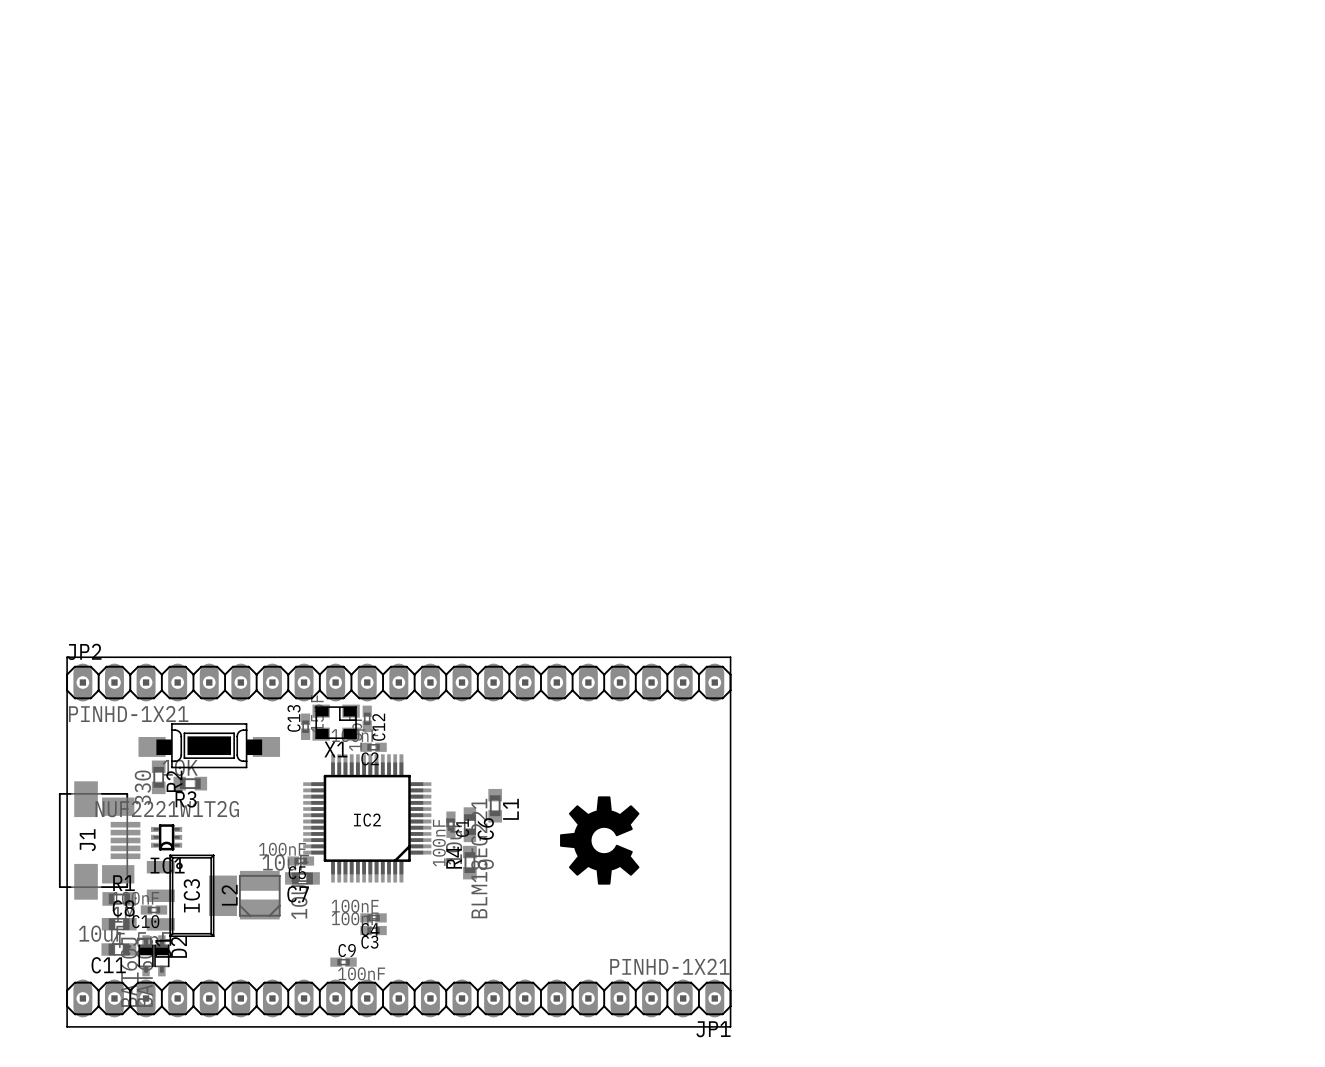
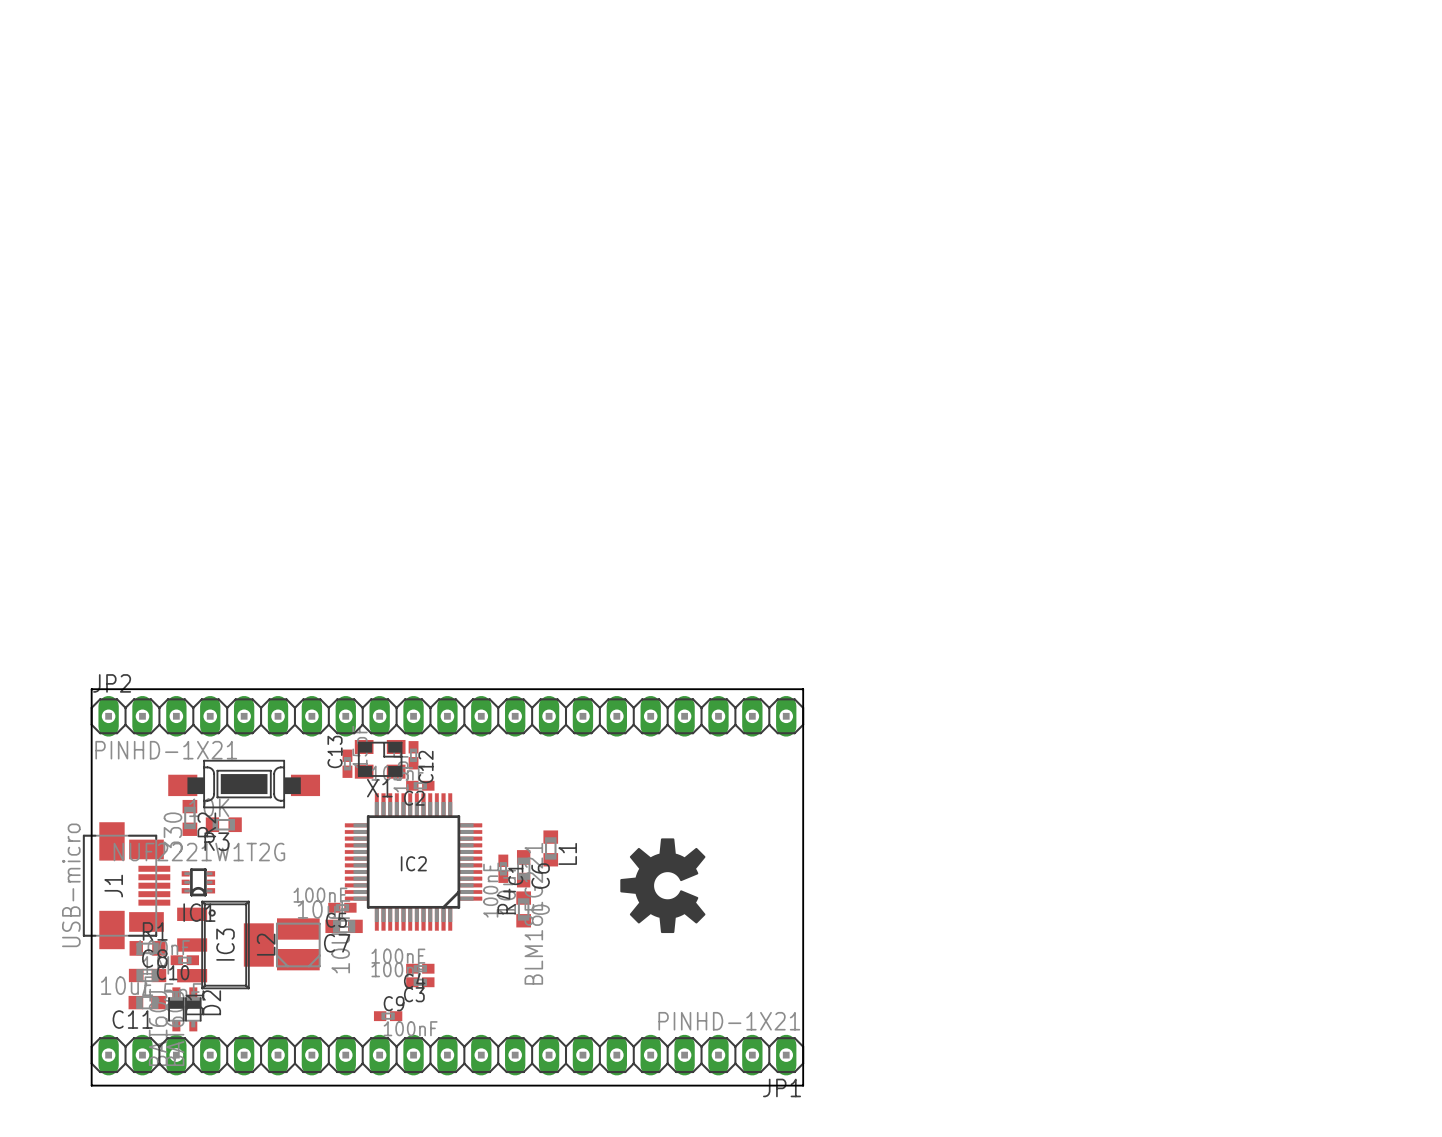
J1 value: none -> USB-micro (71, 885)

